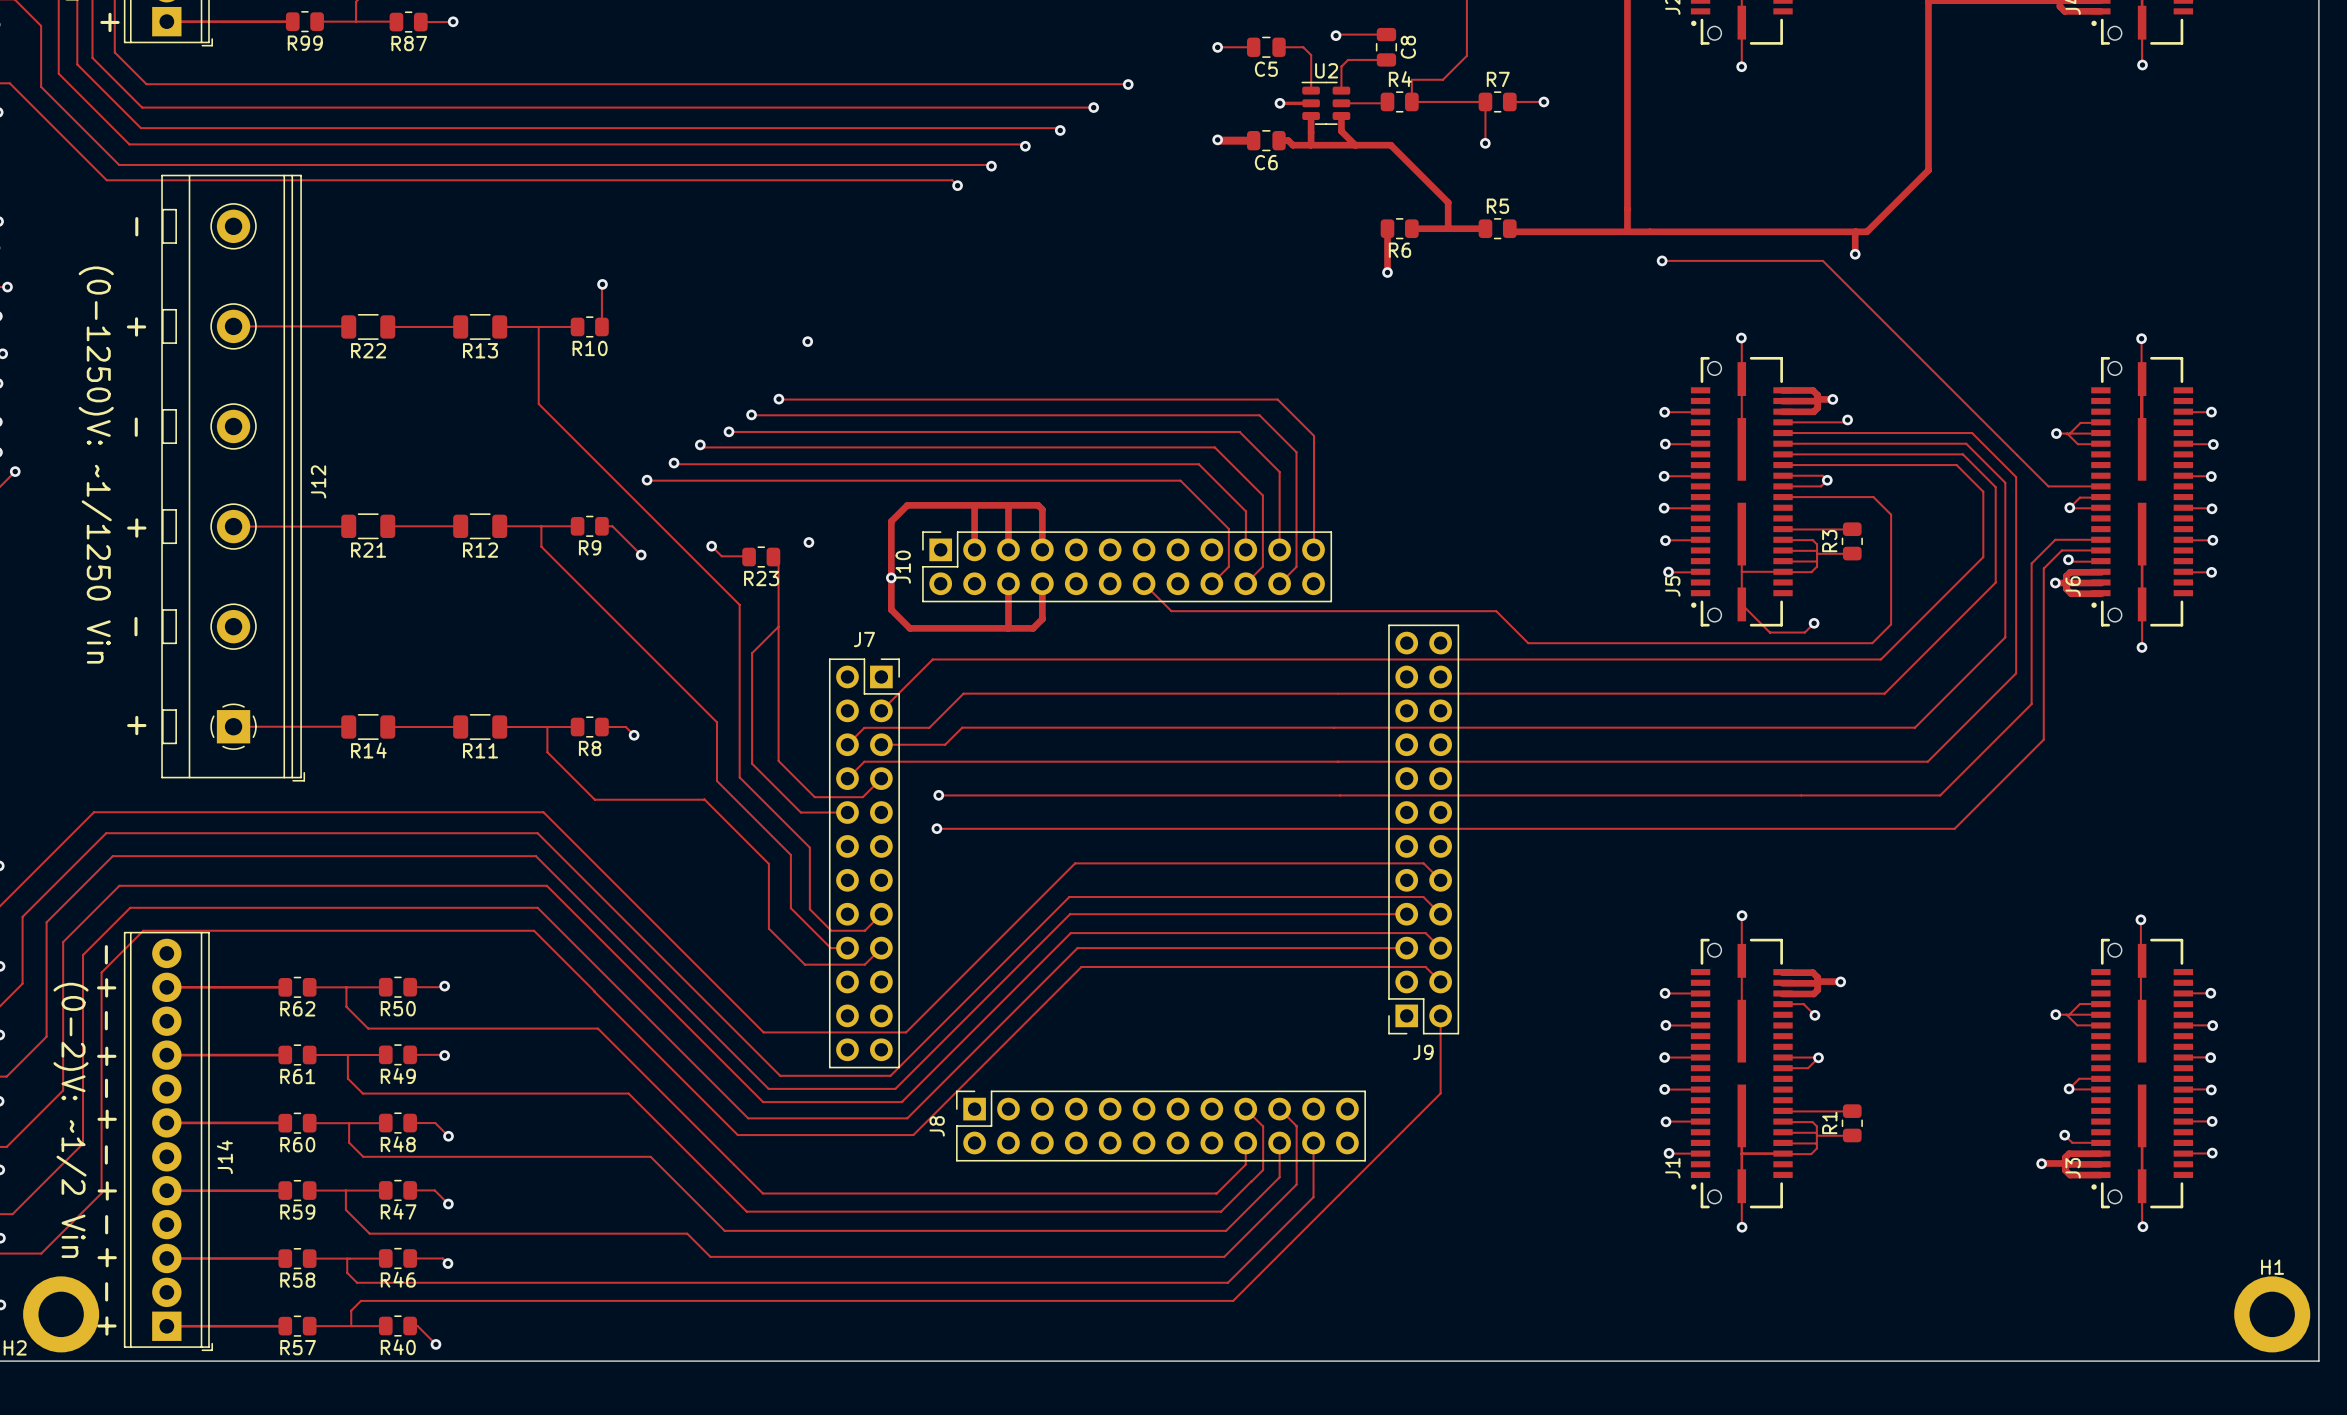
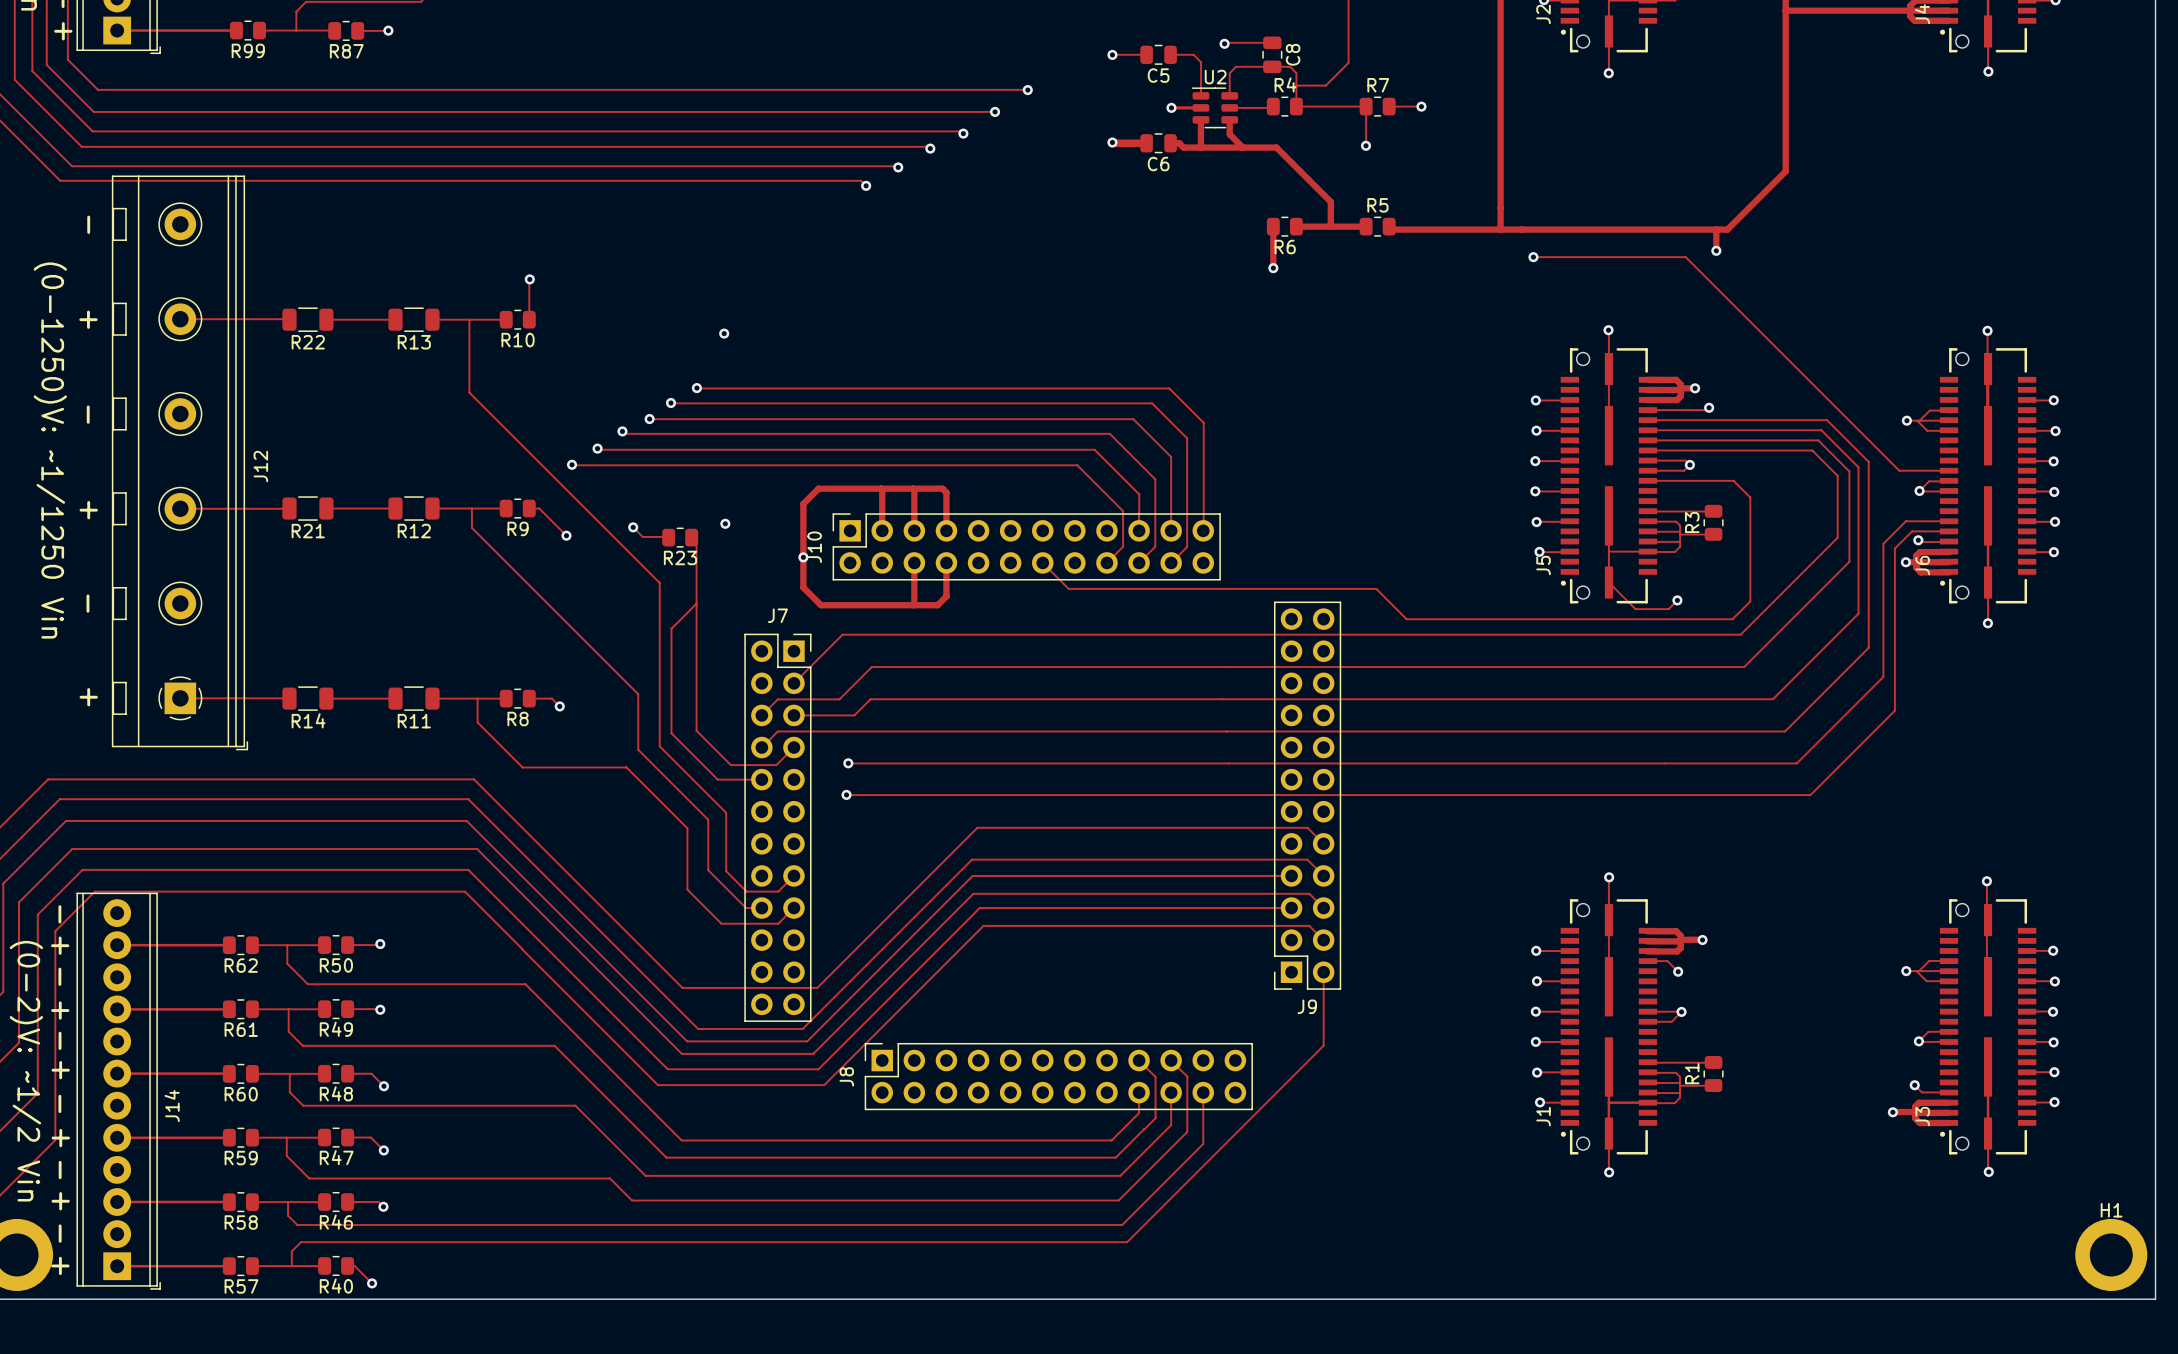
track: none -> (1272, 66) (1290, 66) (1296, 73) (1296, 85)

